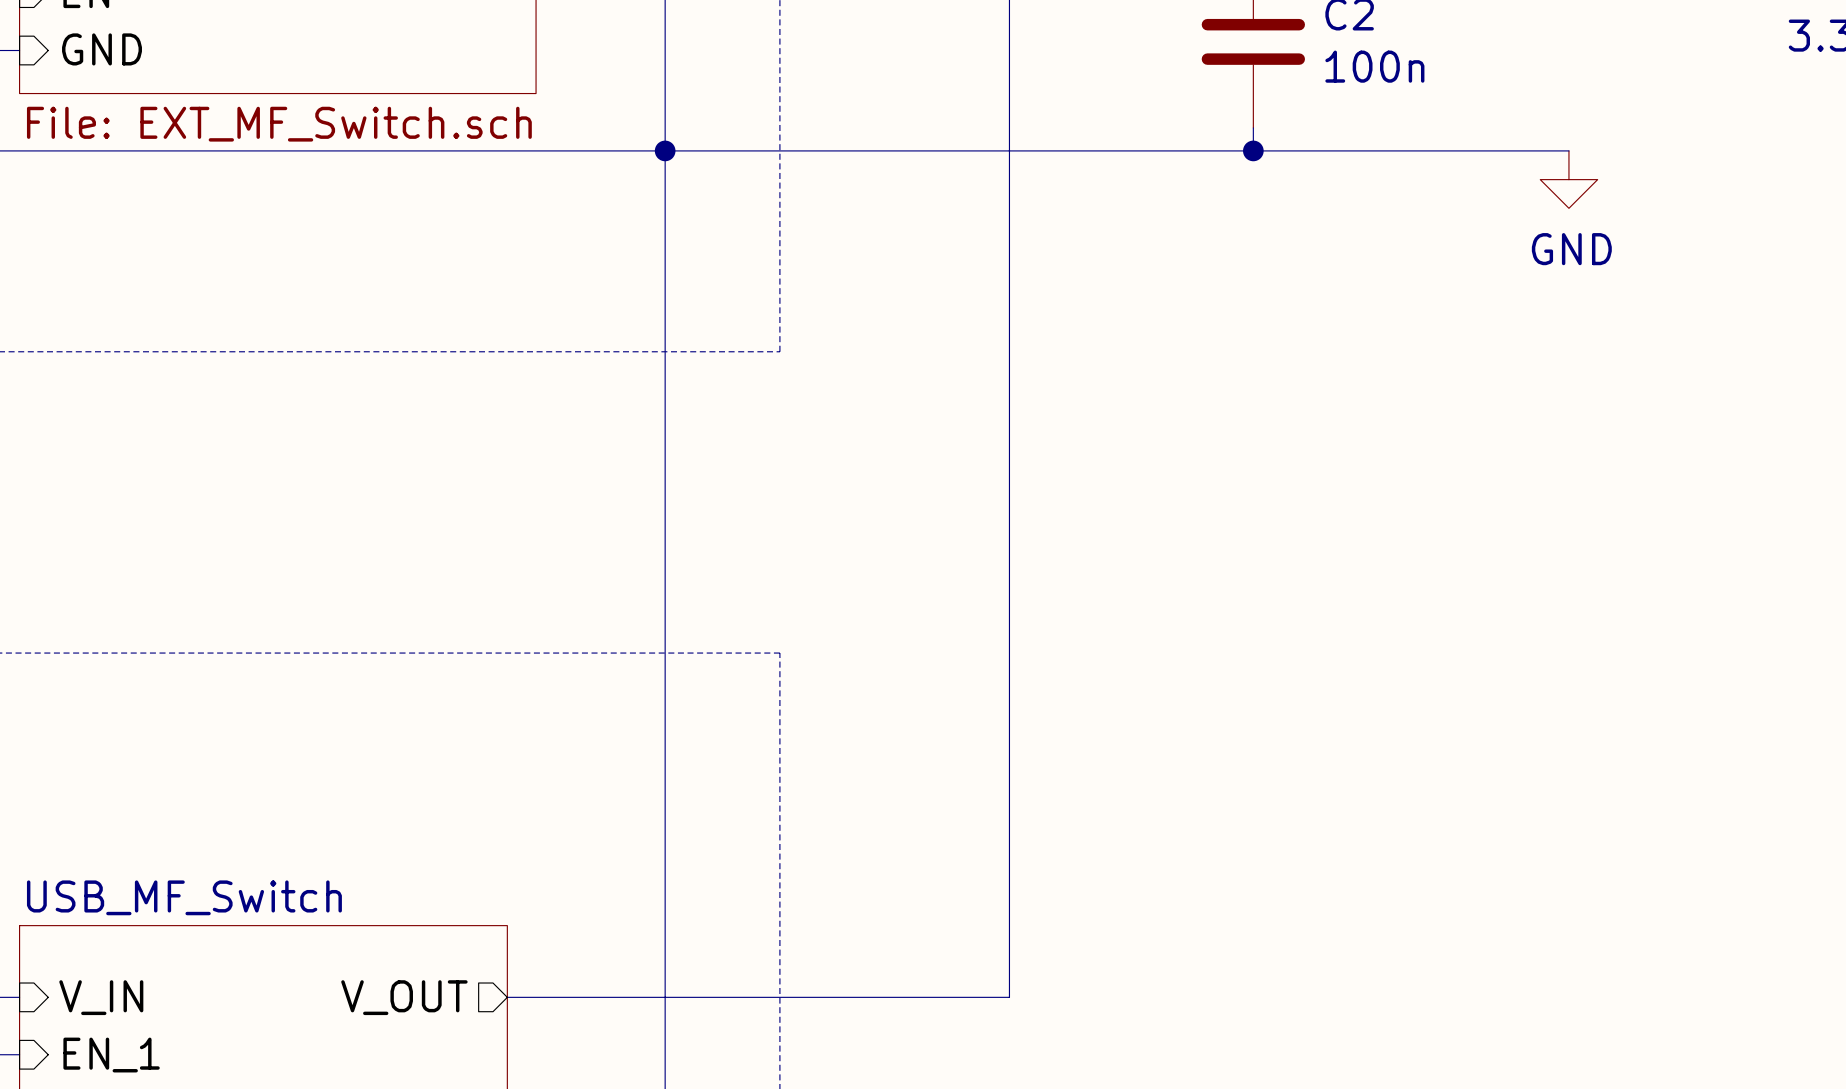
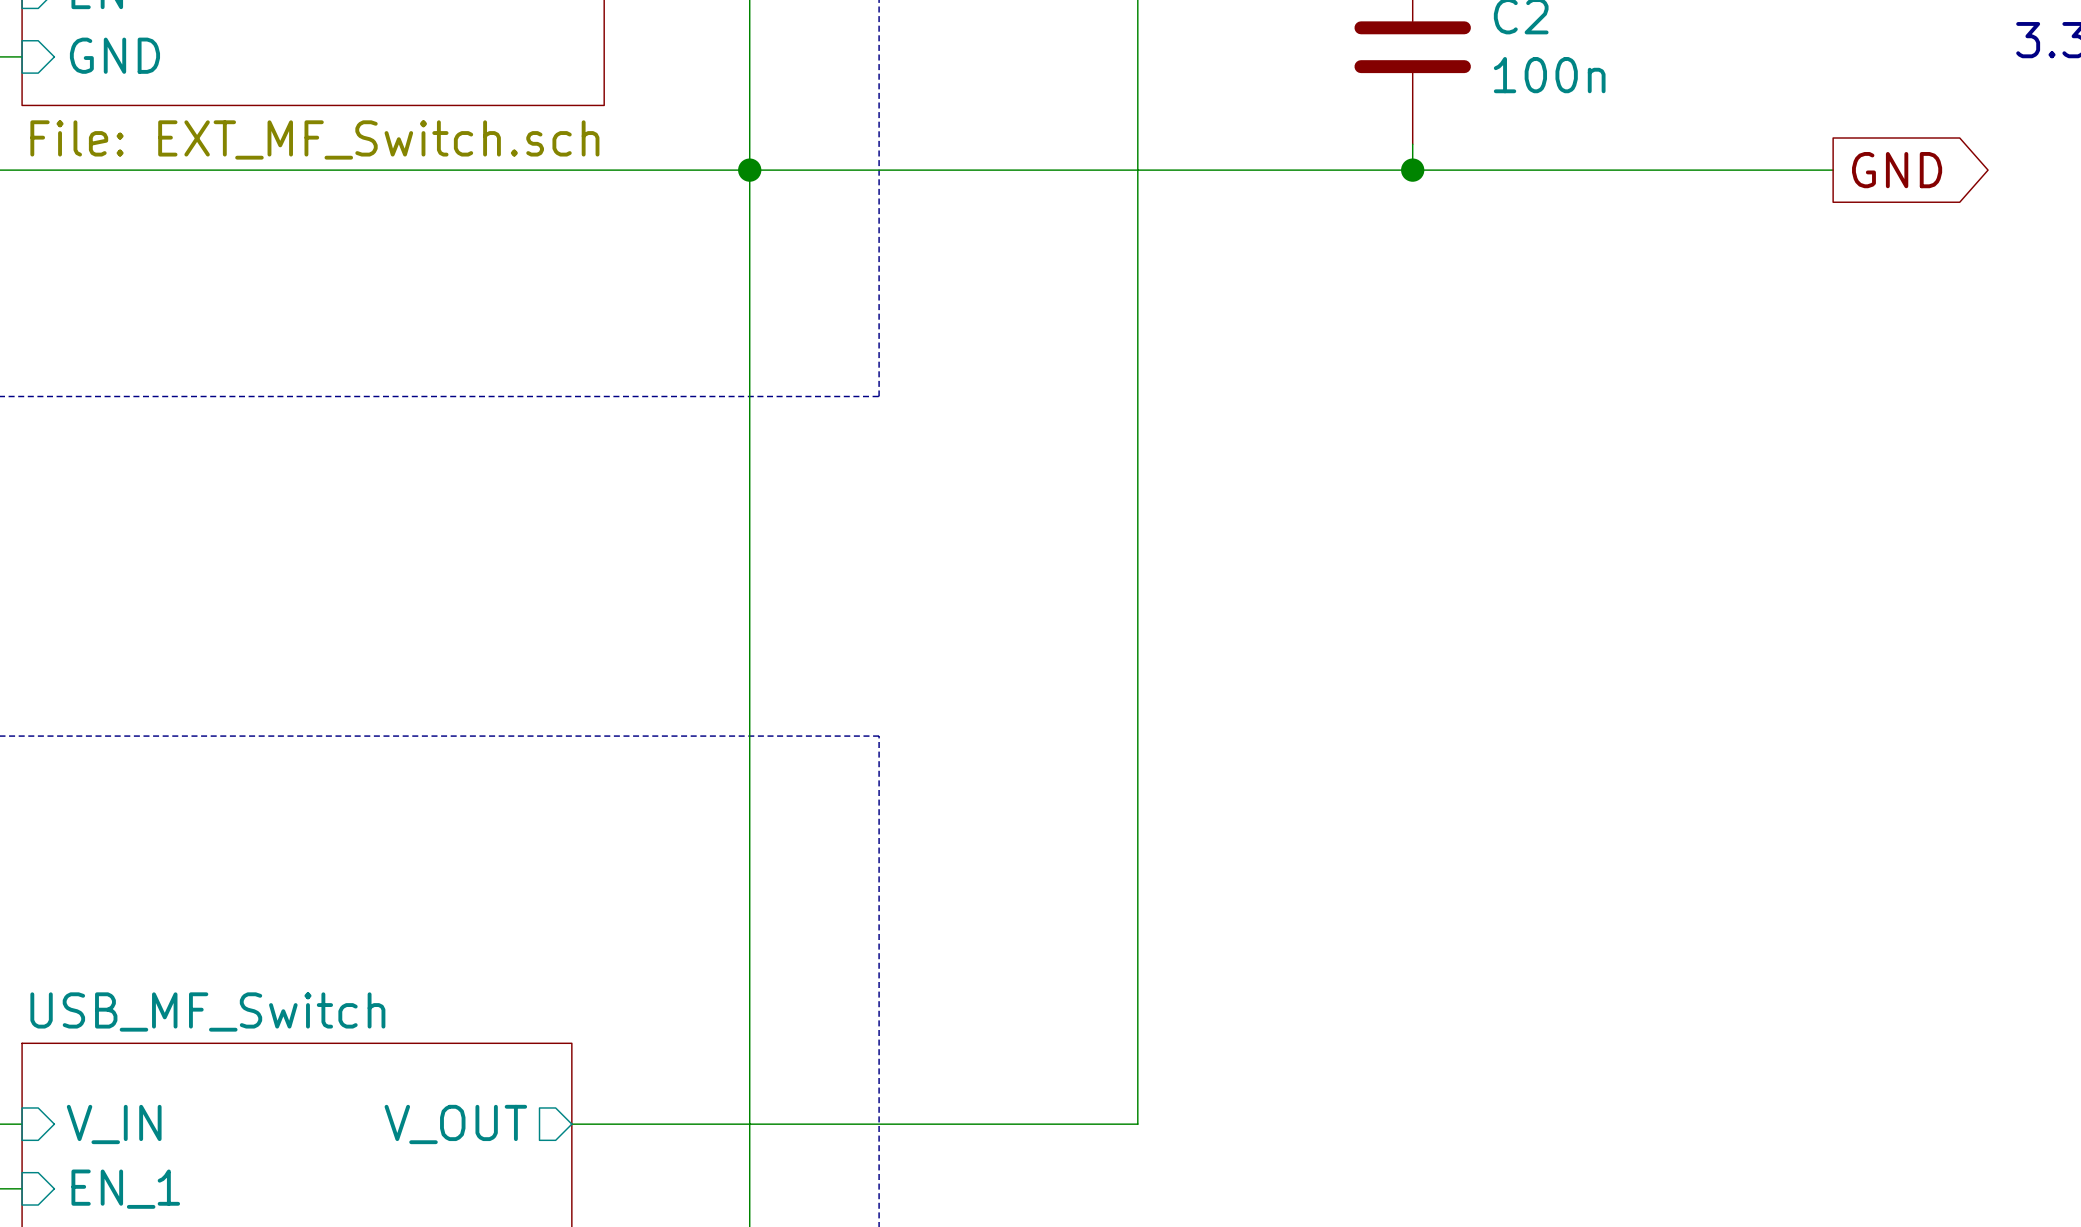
wire: none -> (1768, 170) (1833, 170)
global label: none -> GND (1897, 170)
power symbol: GND (1568, 179) -> none

